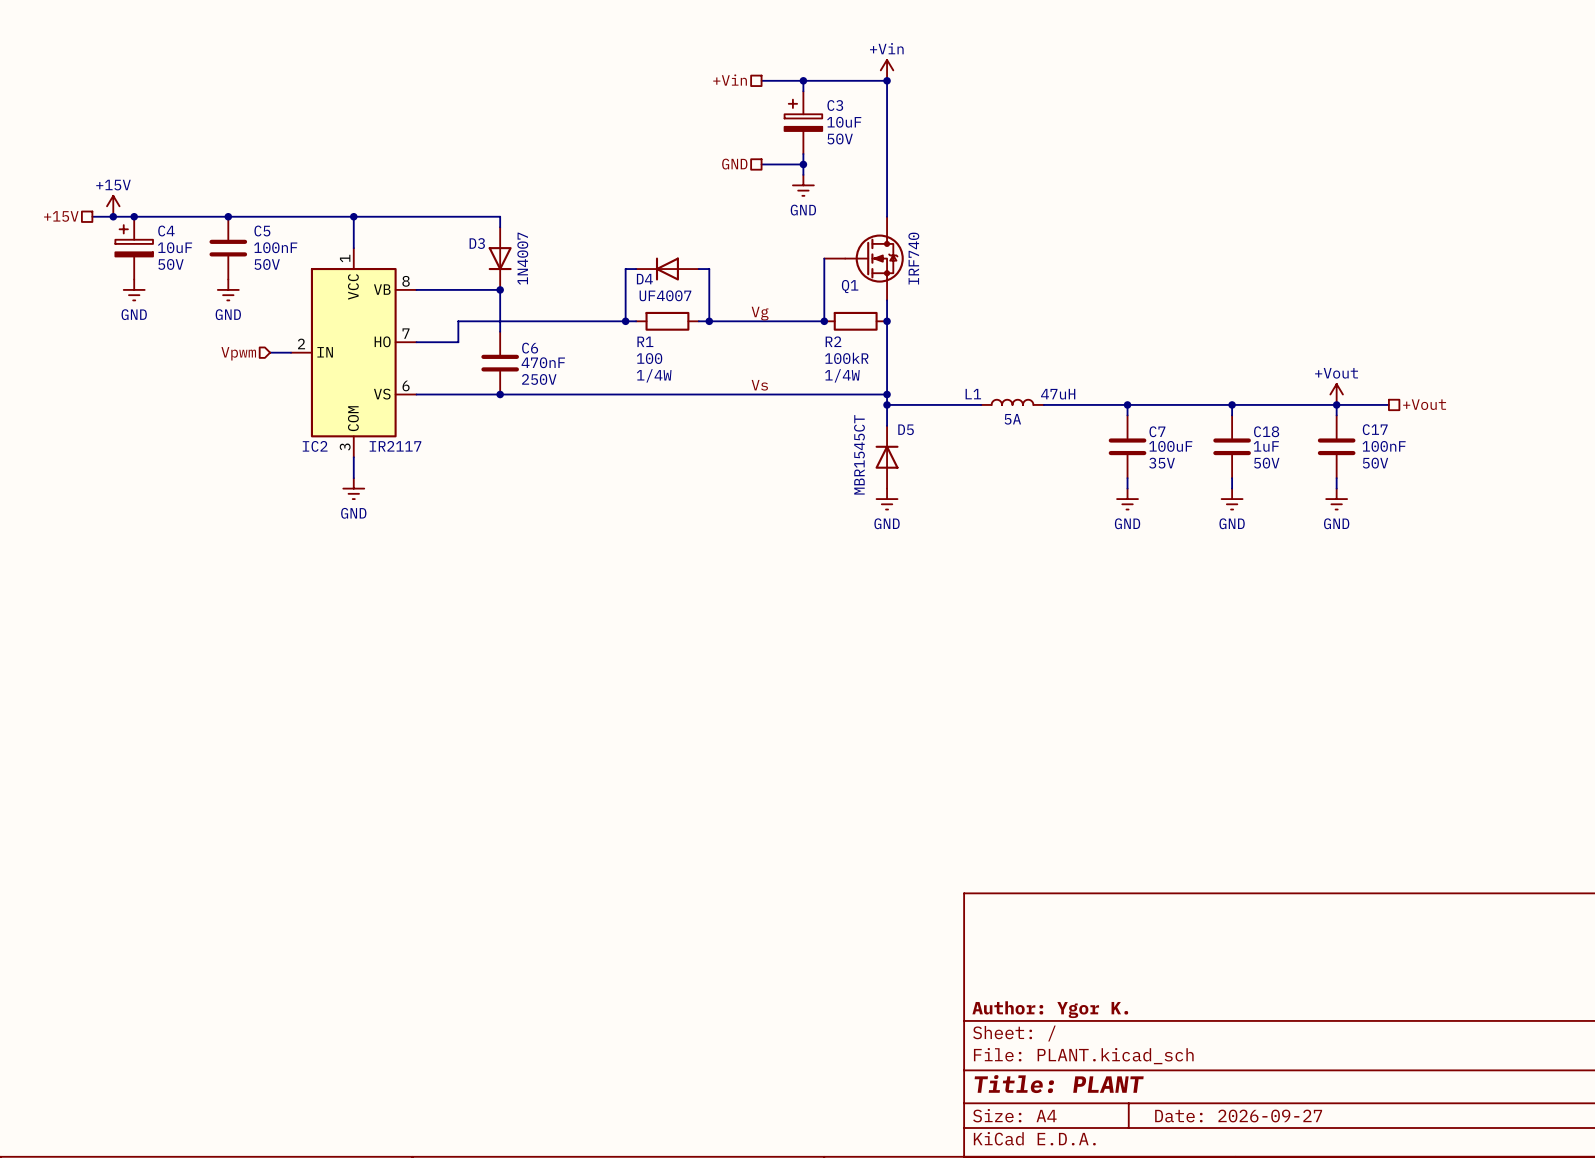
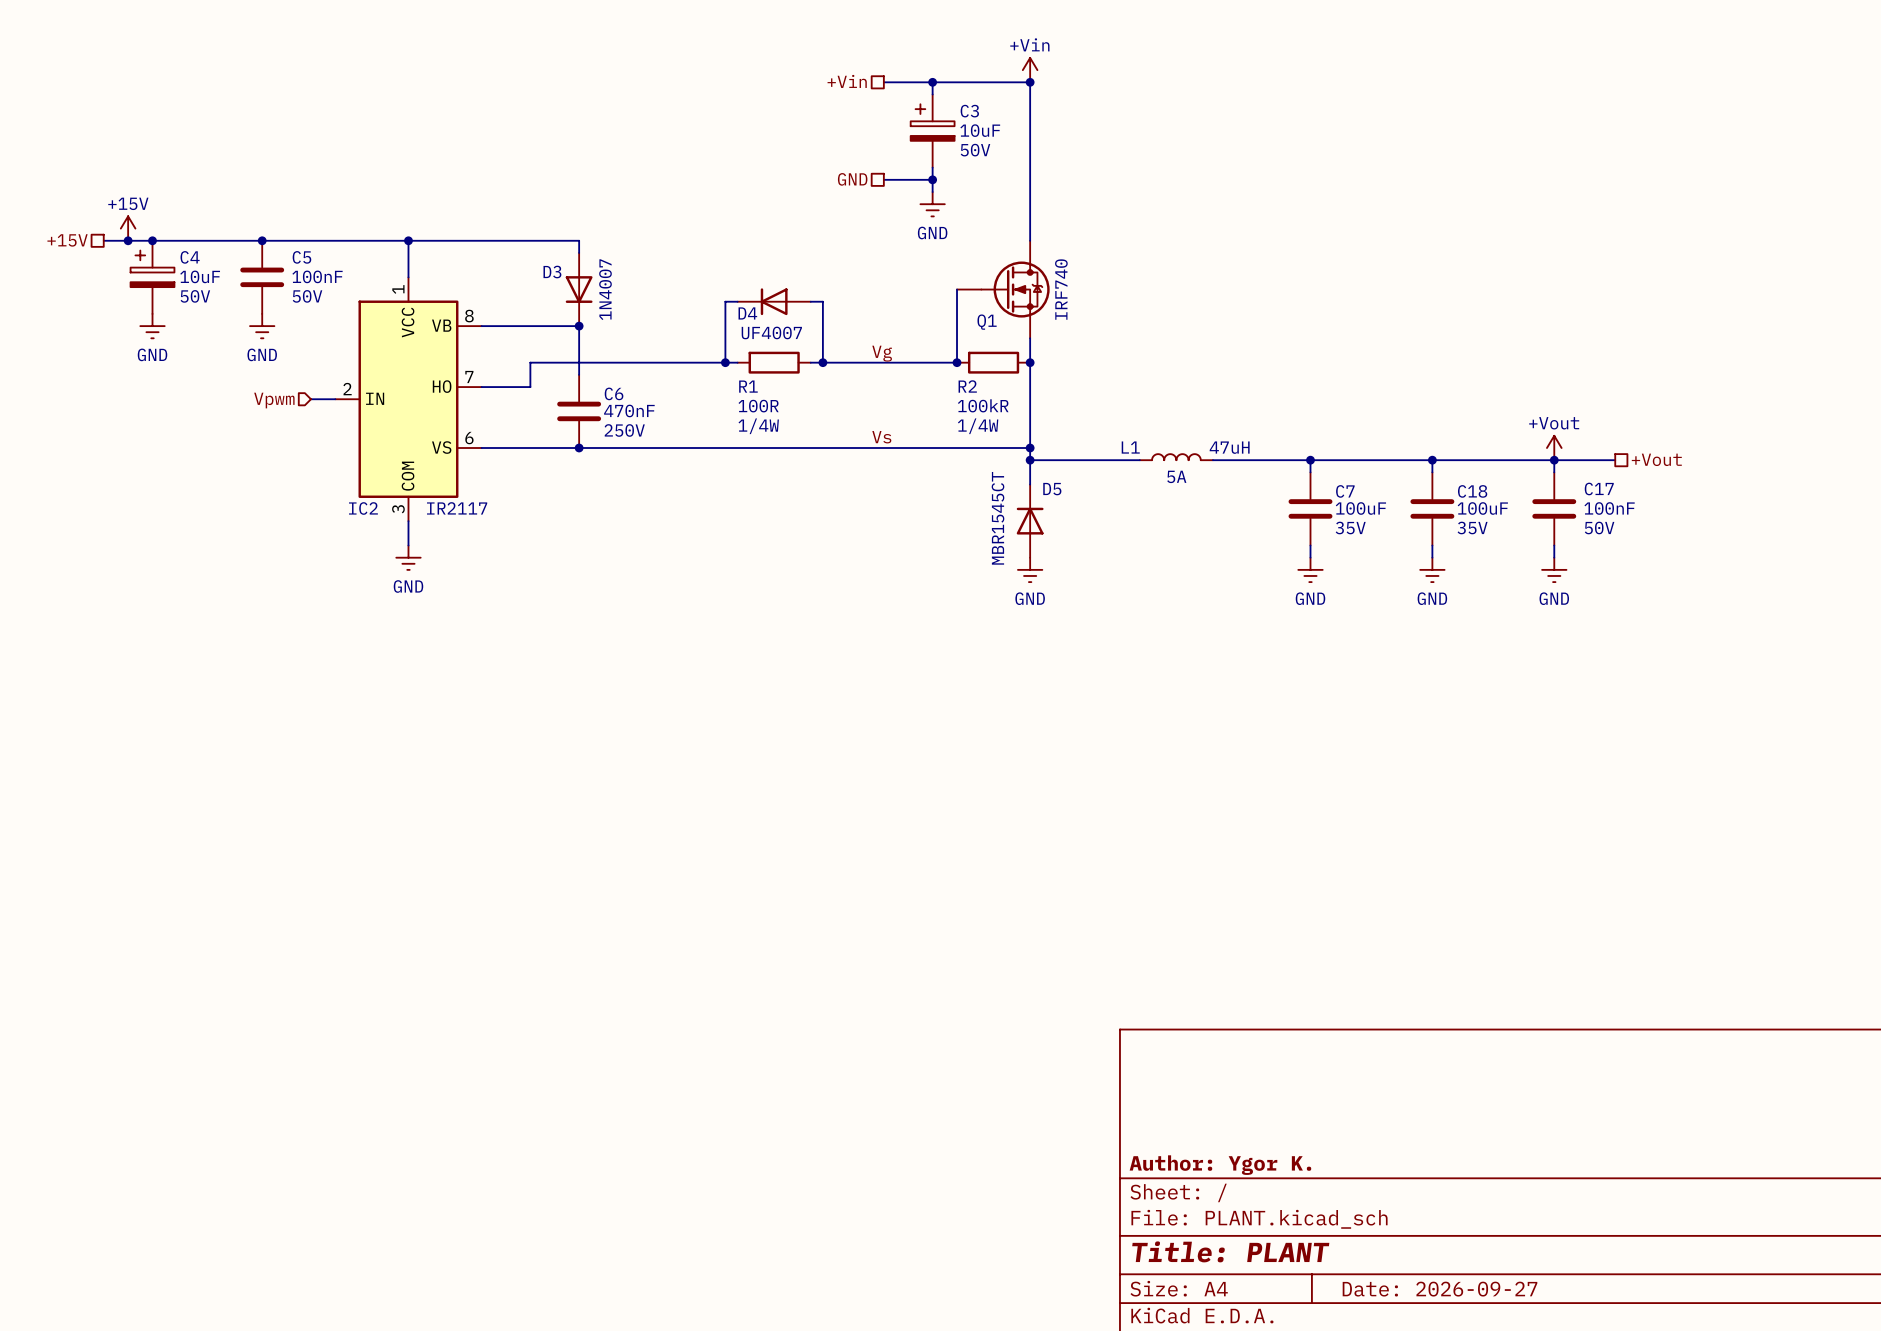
R1 value: 100 (649, 358) -> 100R (758, 406)
C18 value: 1uF (1266, 446) -> 100uF (1482, 508)
C18 text: 50V (1266, 463) -> 35V (1472, 527)

